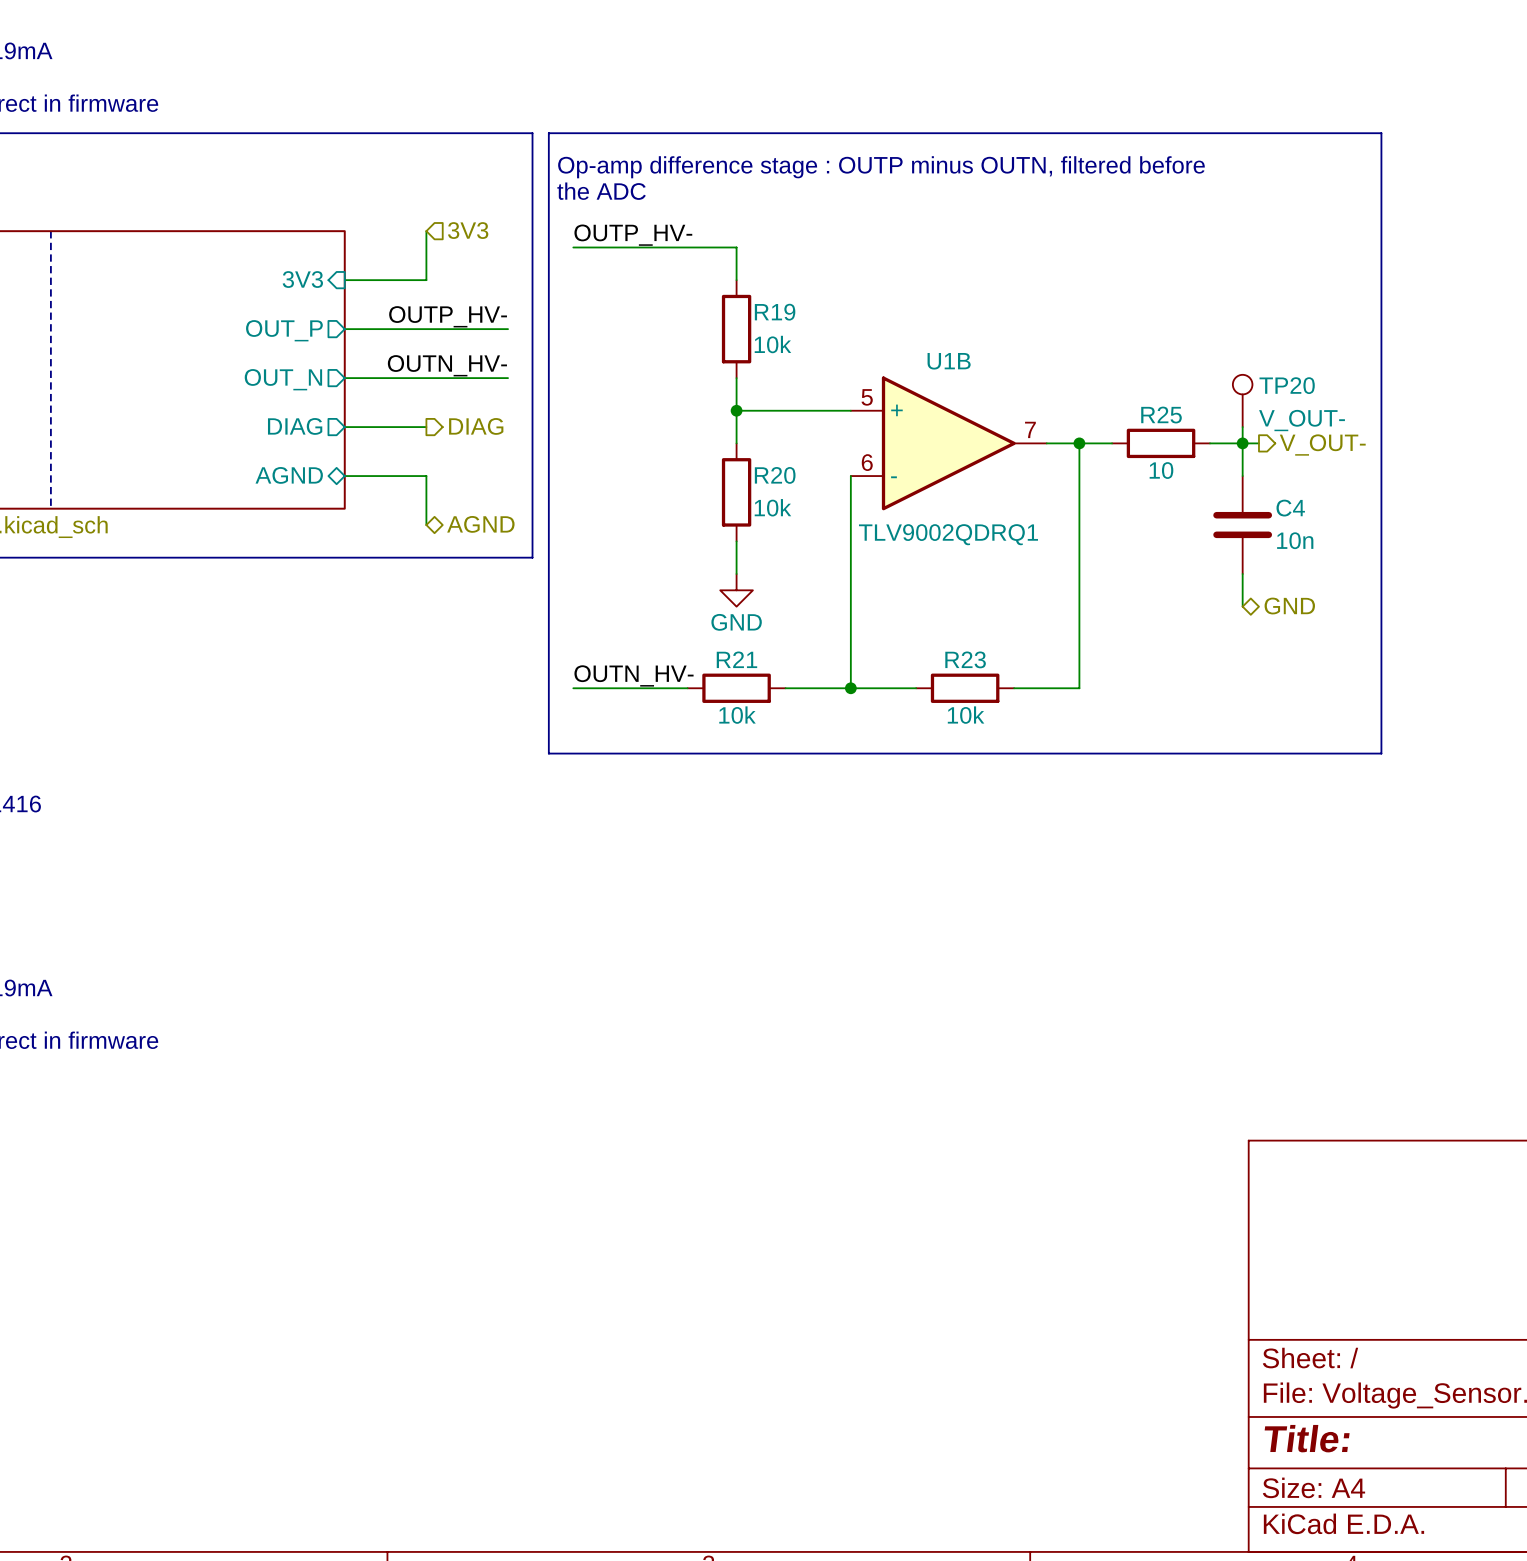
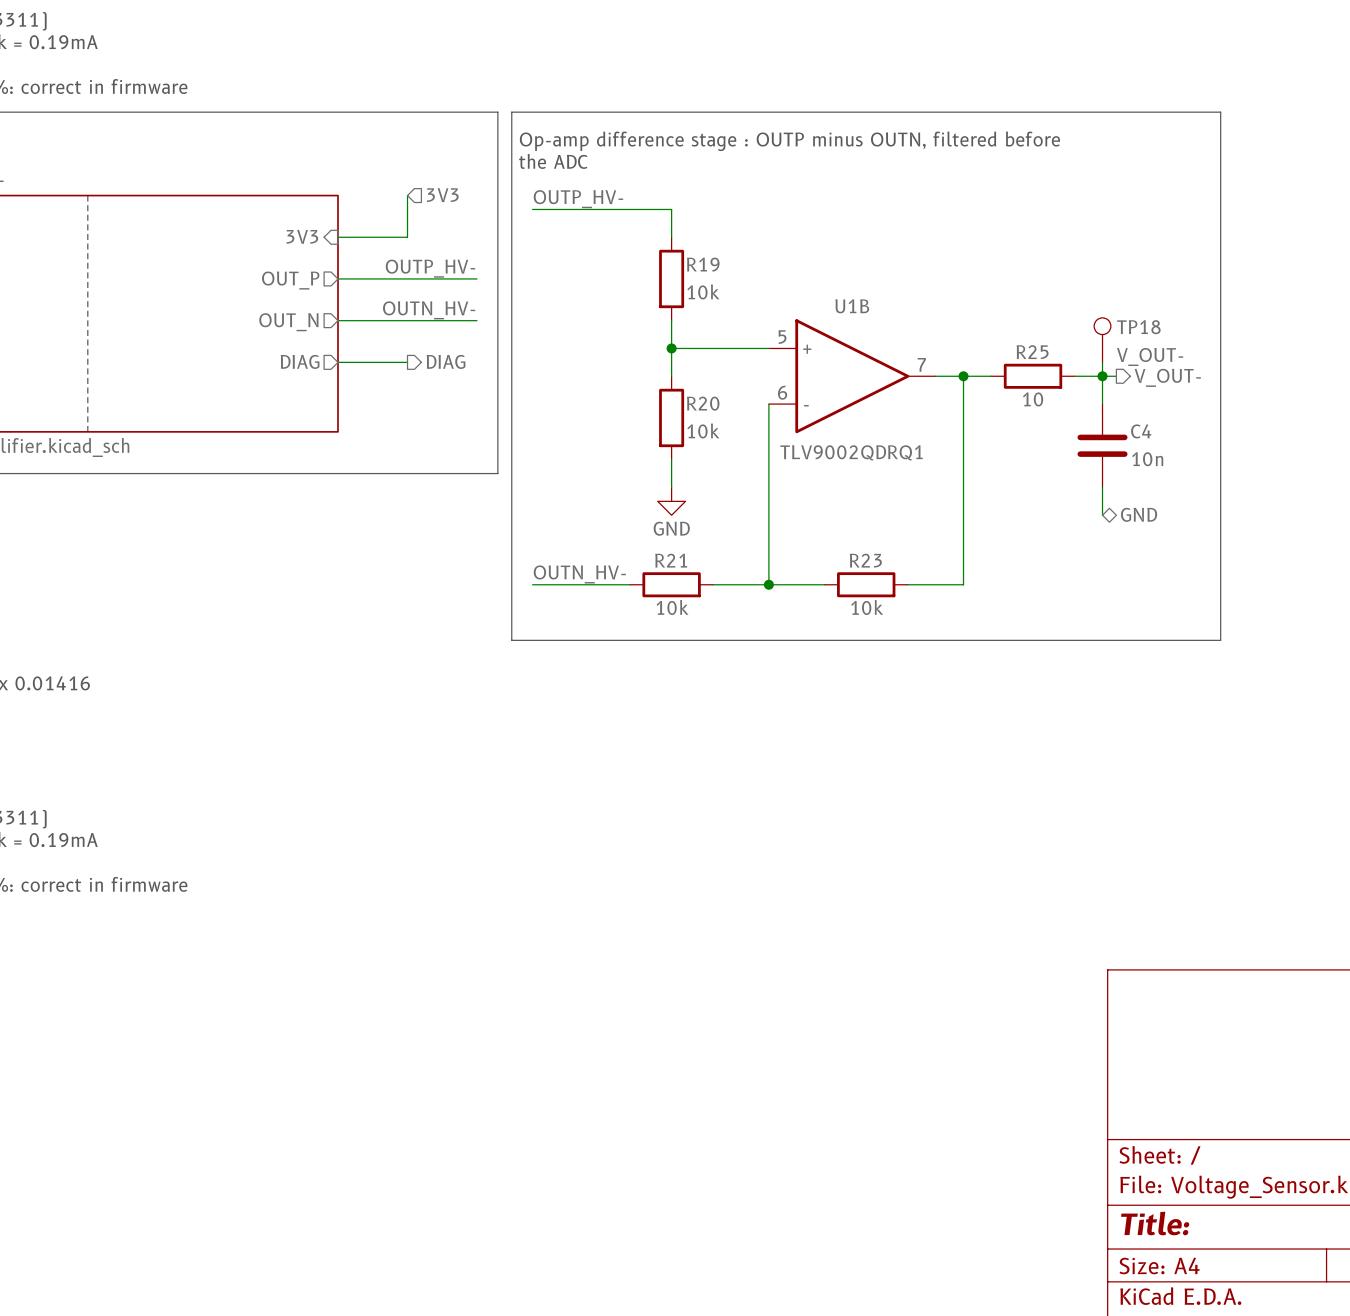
TP20 name: TP20 (1287, 385) -> TP18 (1138, 327)
sheet pin: AGND (289, 475) -> none
wire: (344, 476) (426, 476) (426, 525) -> none
hierarchical label: AGND (480, 524) -> none

